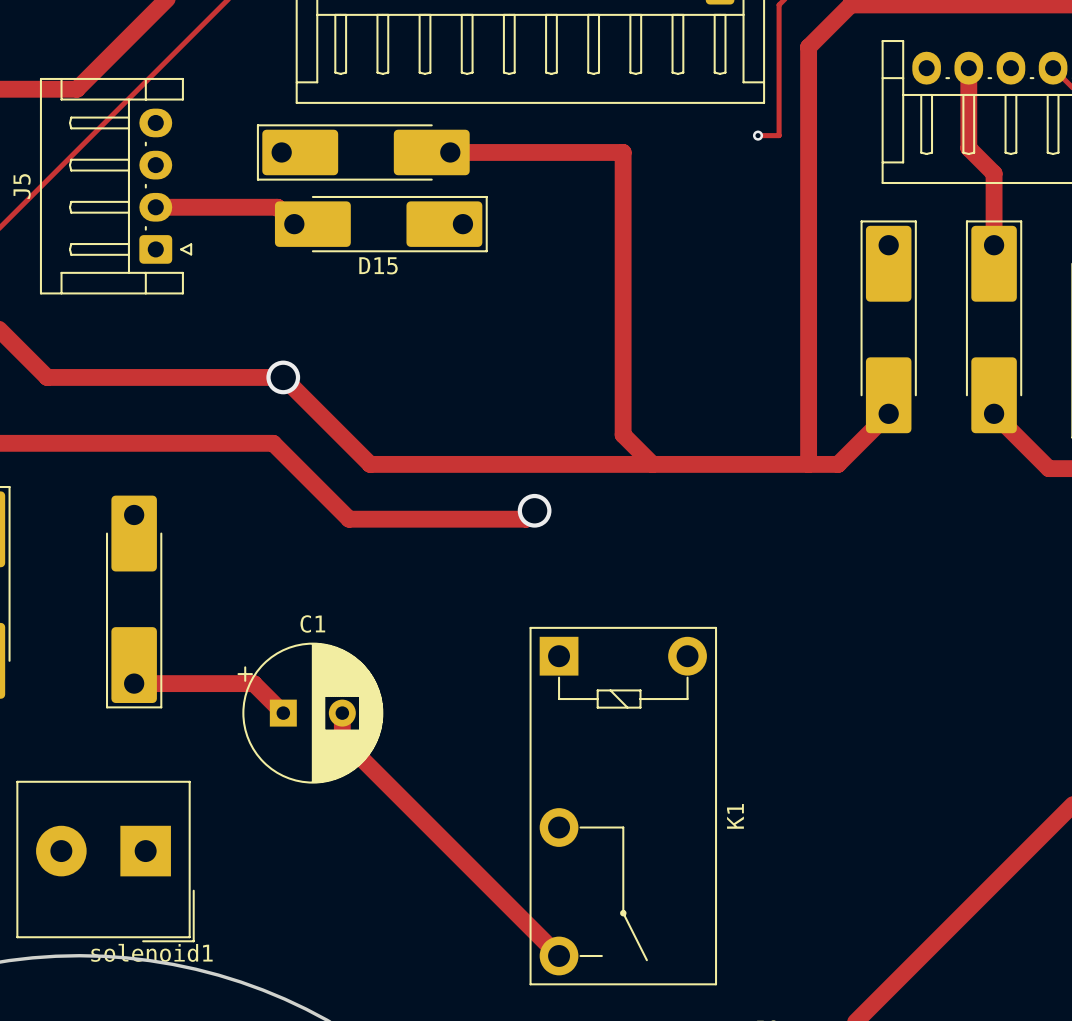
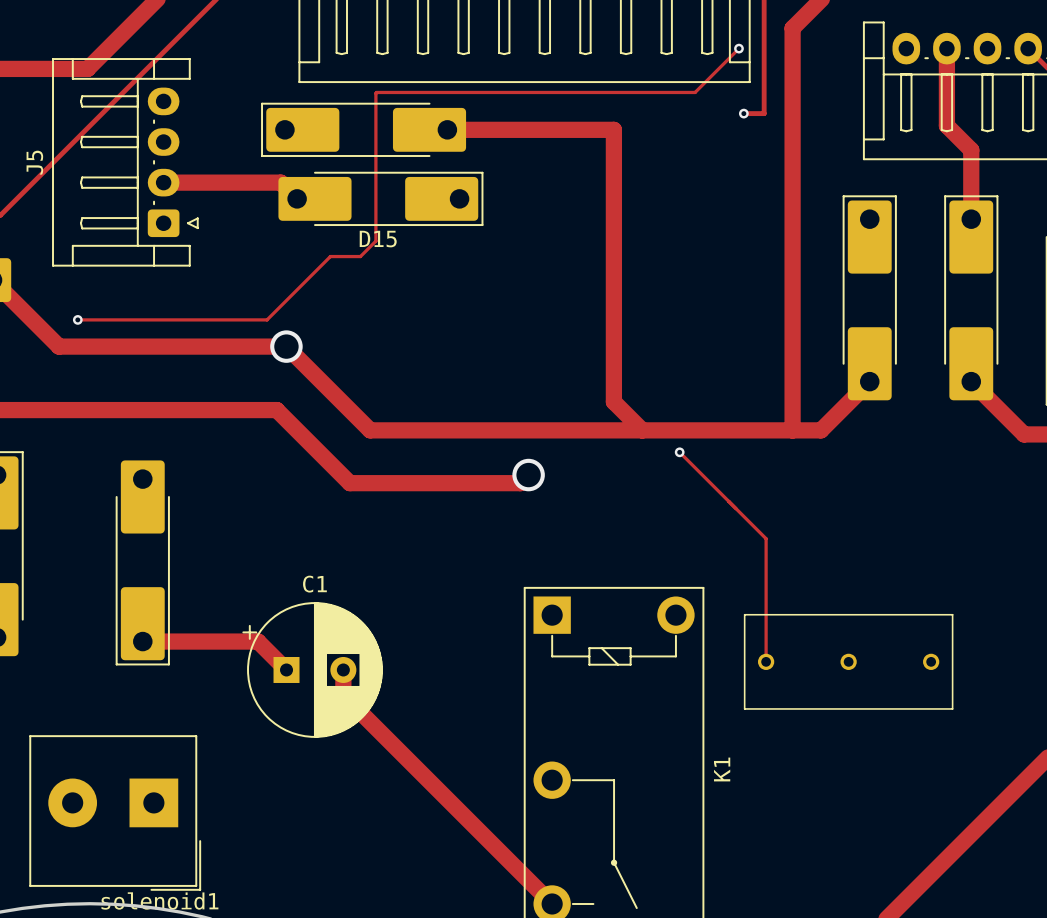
track: none -> (738, 48) (695, 92) (376, 92) (375, 241) (360, 256) (330, 256) (267, 319) (77, 319)
via: none -> (738, 48)
via: none -> (77, 319)
track: none -> (679, 452) (766, 538) (766, 661)
via: none -> (679, 452)
part: none -> (848, 661)

